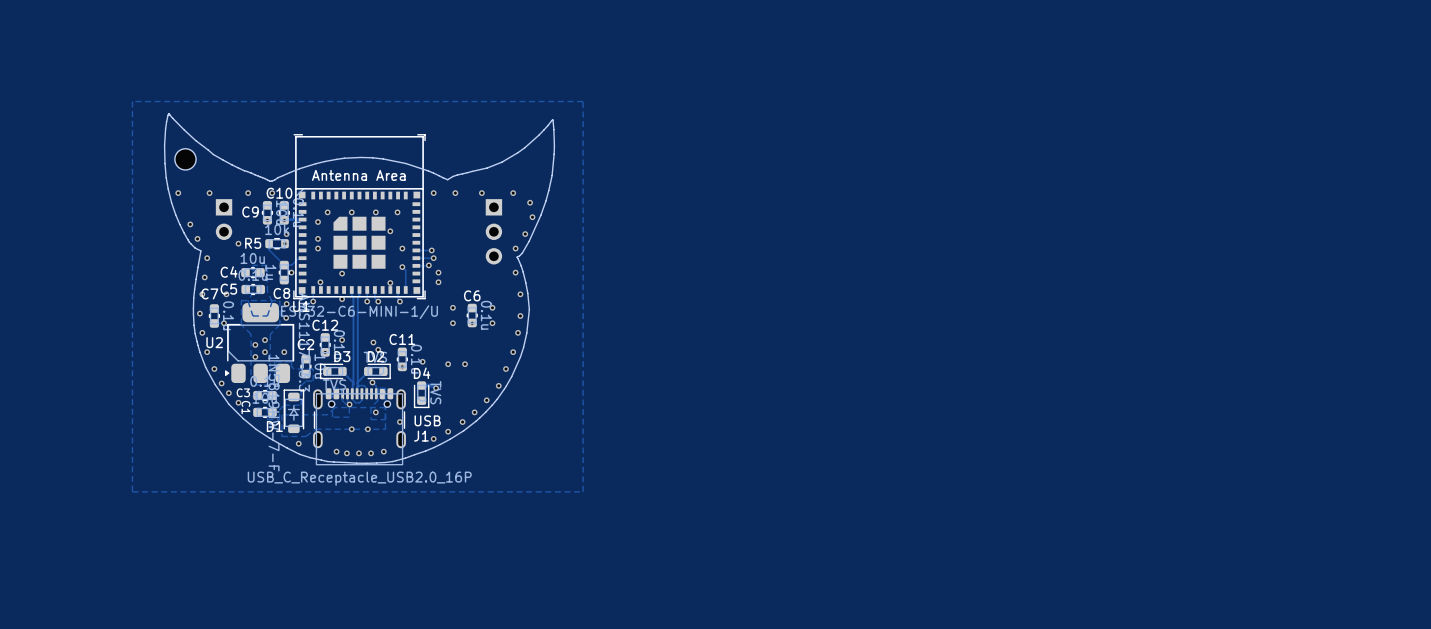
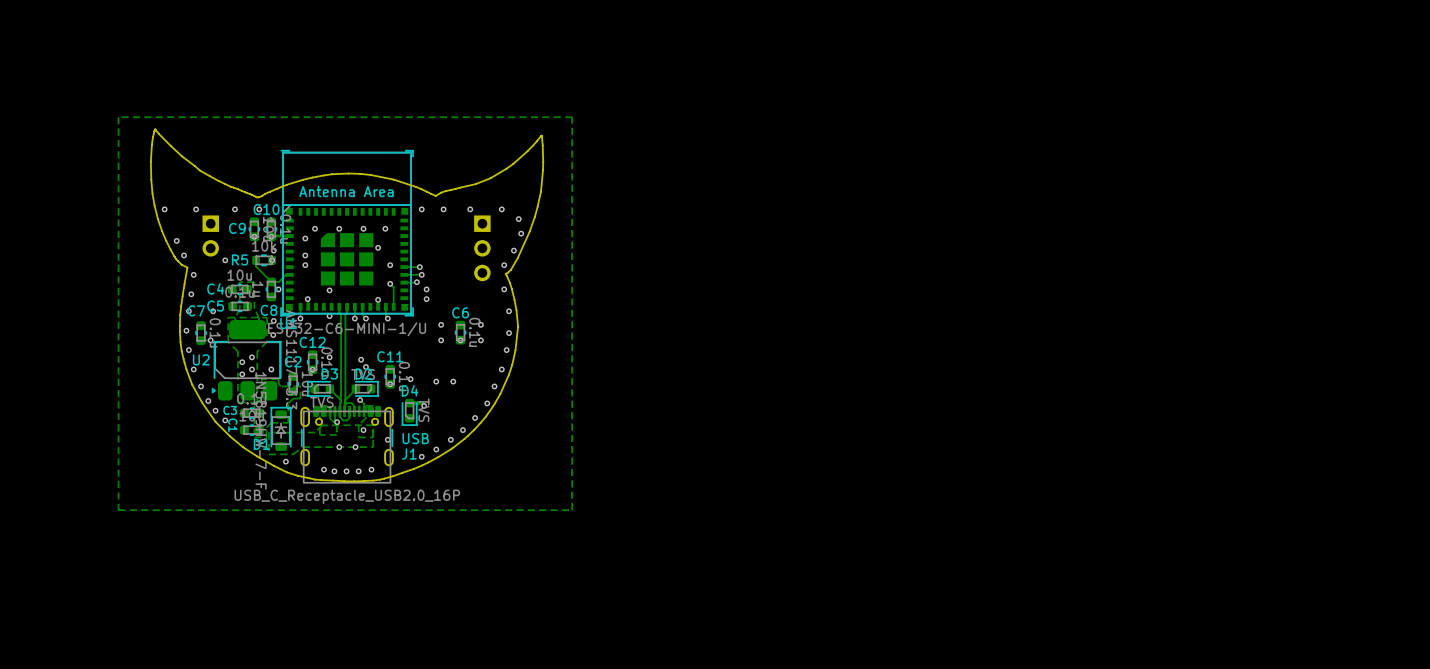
part: (185, 159) -> none

